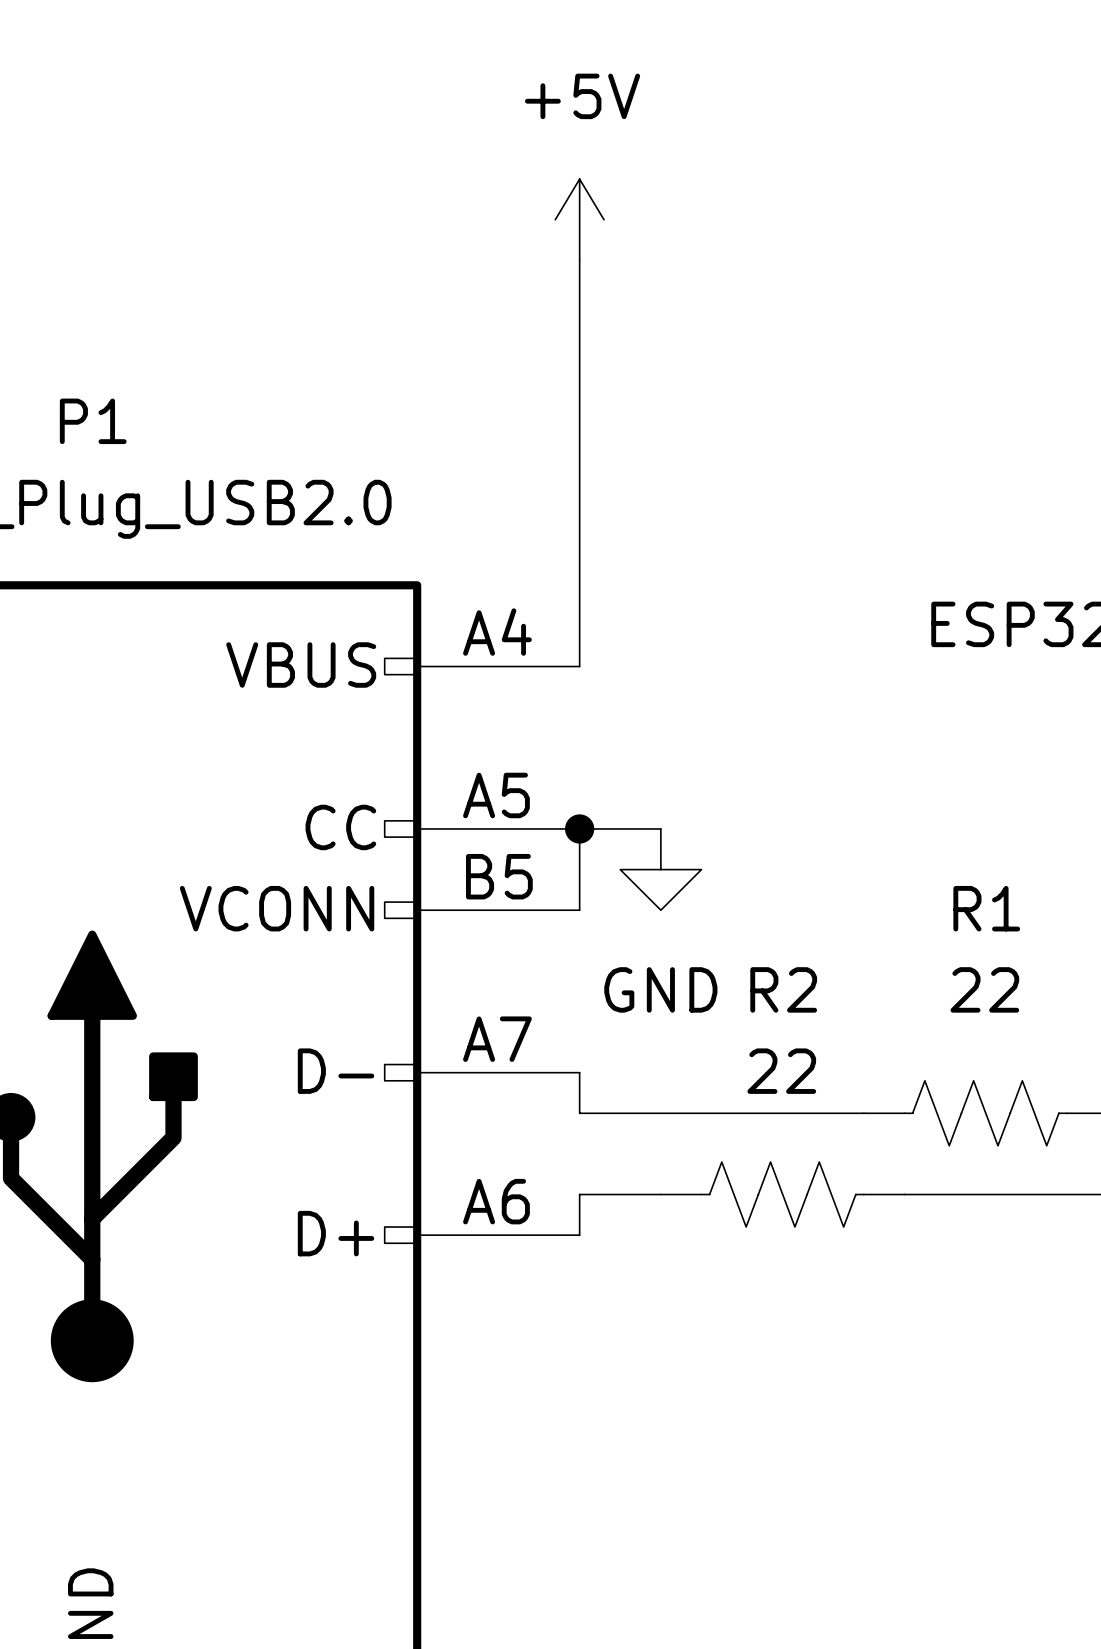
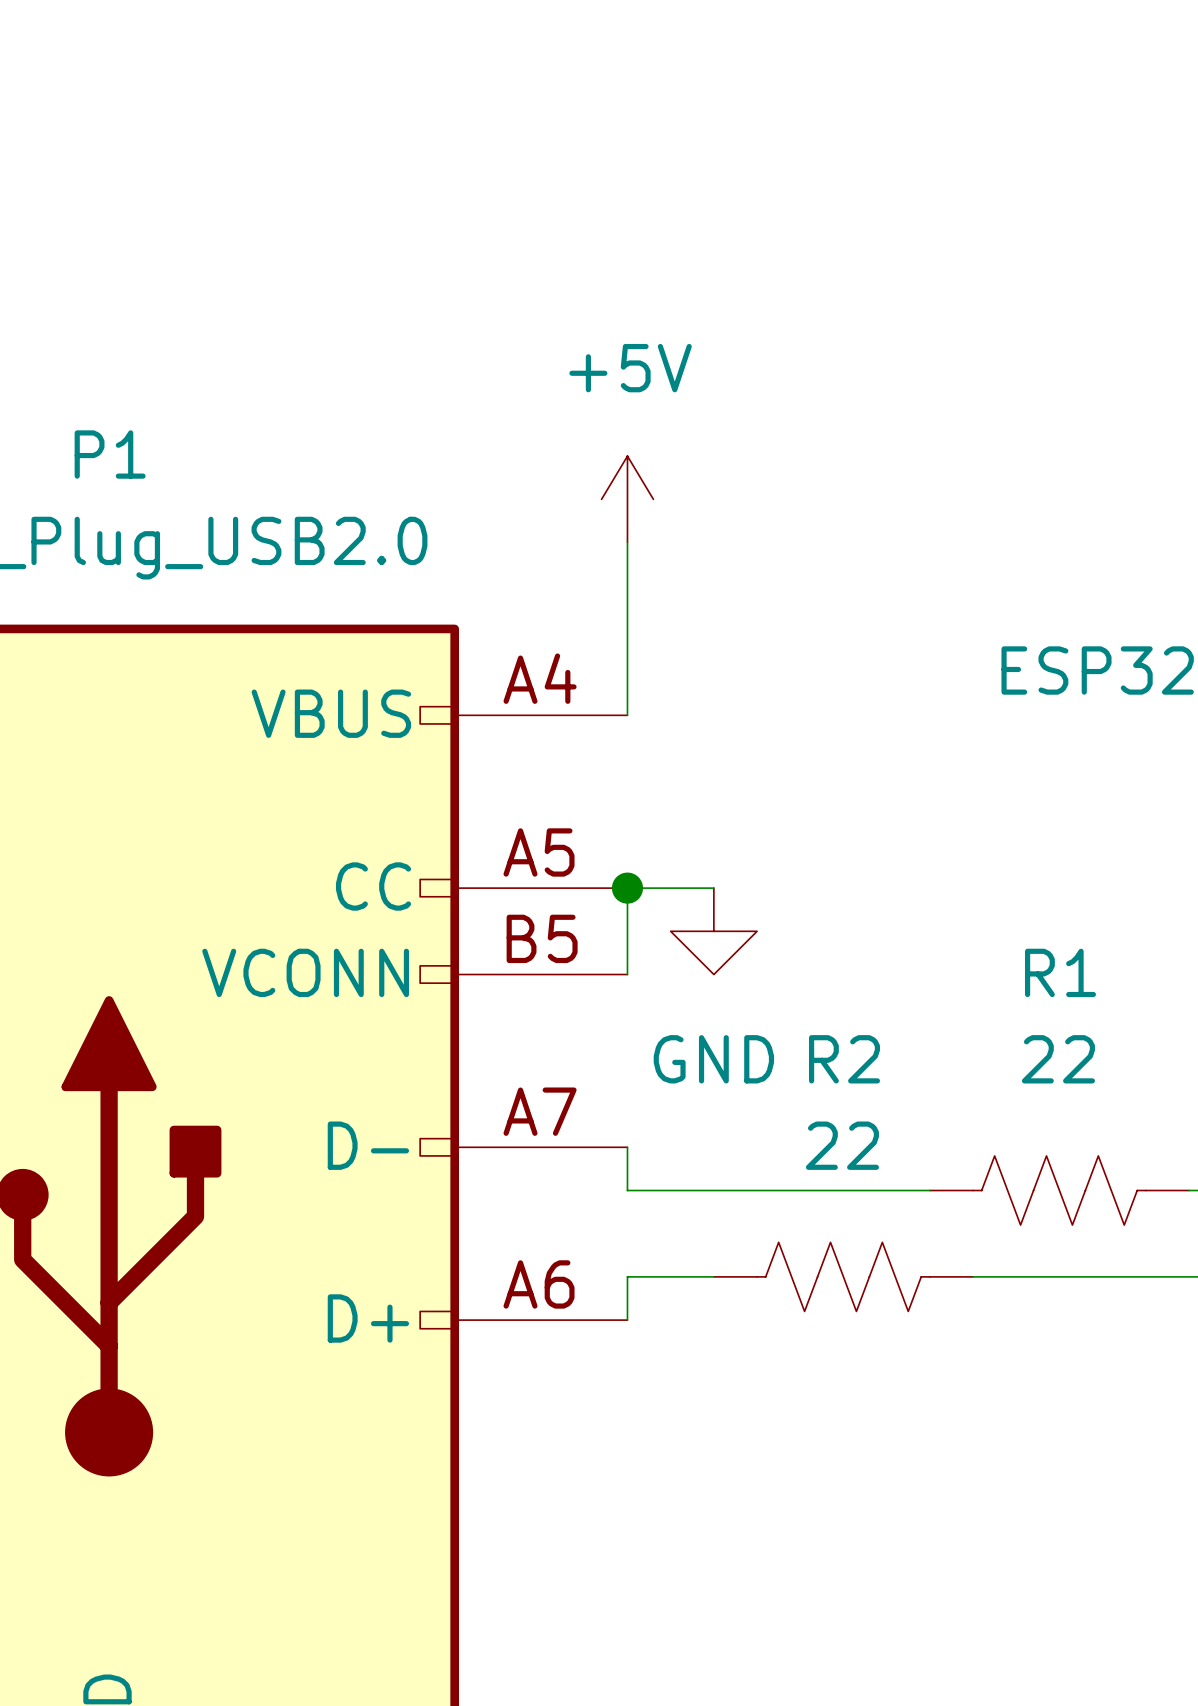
power symbol position: +5V (579, 219) -> +5V (627, 499)
wire: (579, 260) (579, 504) -> none

